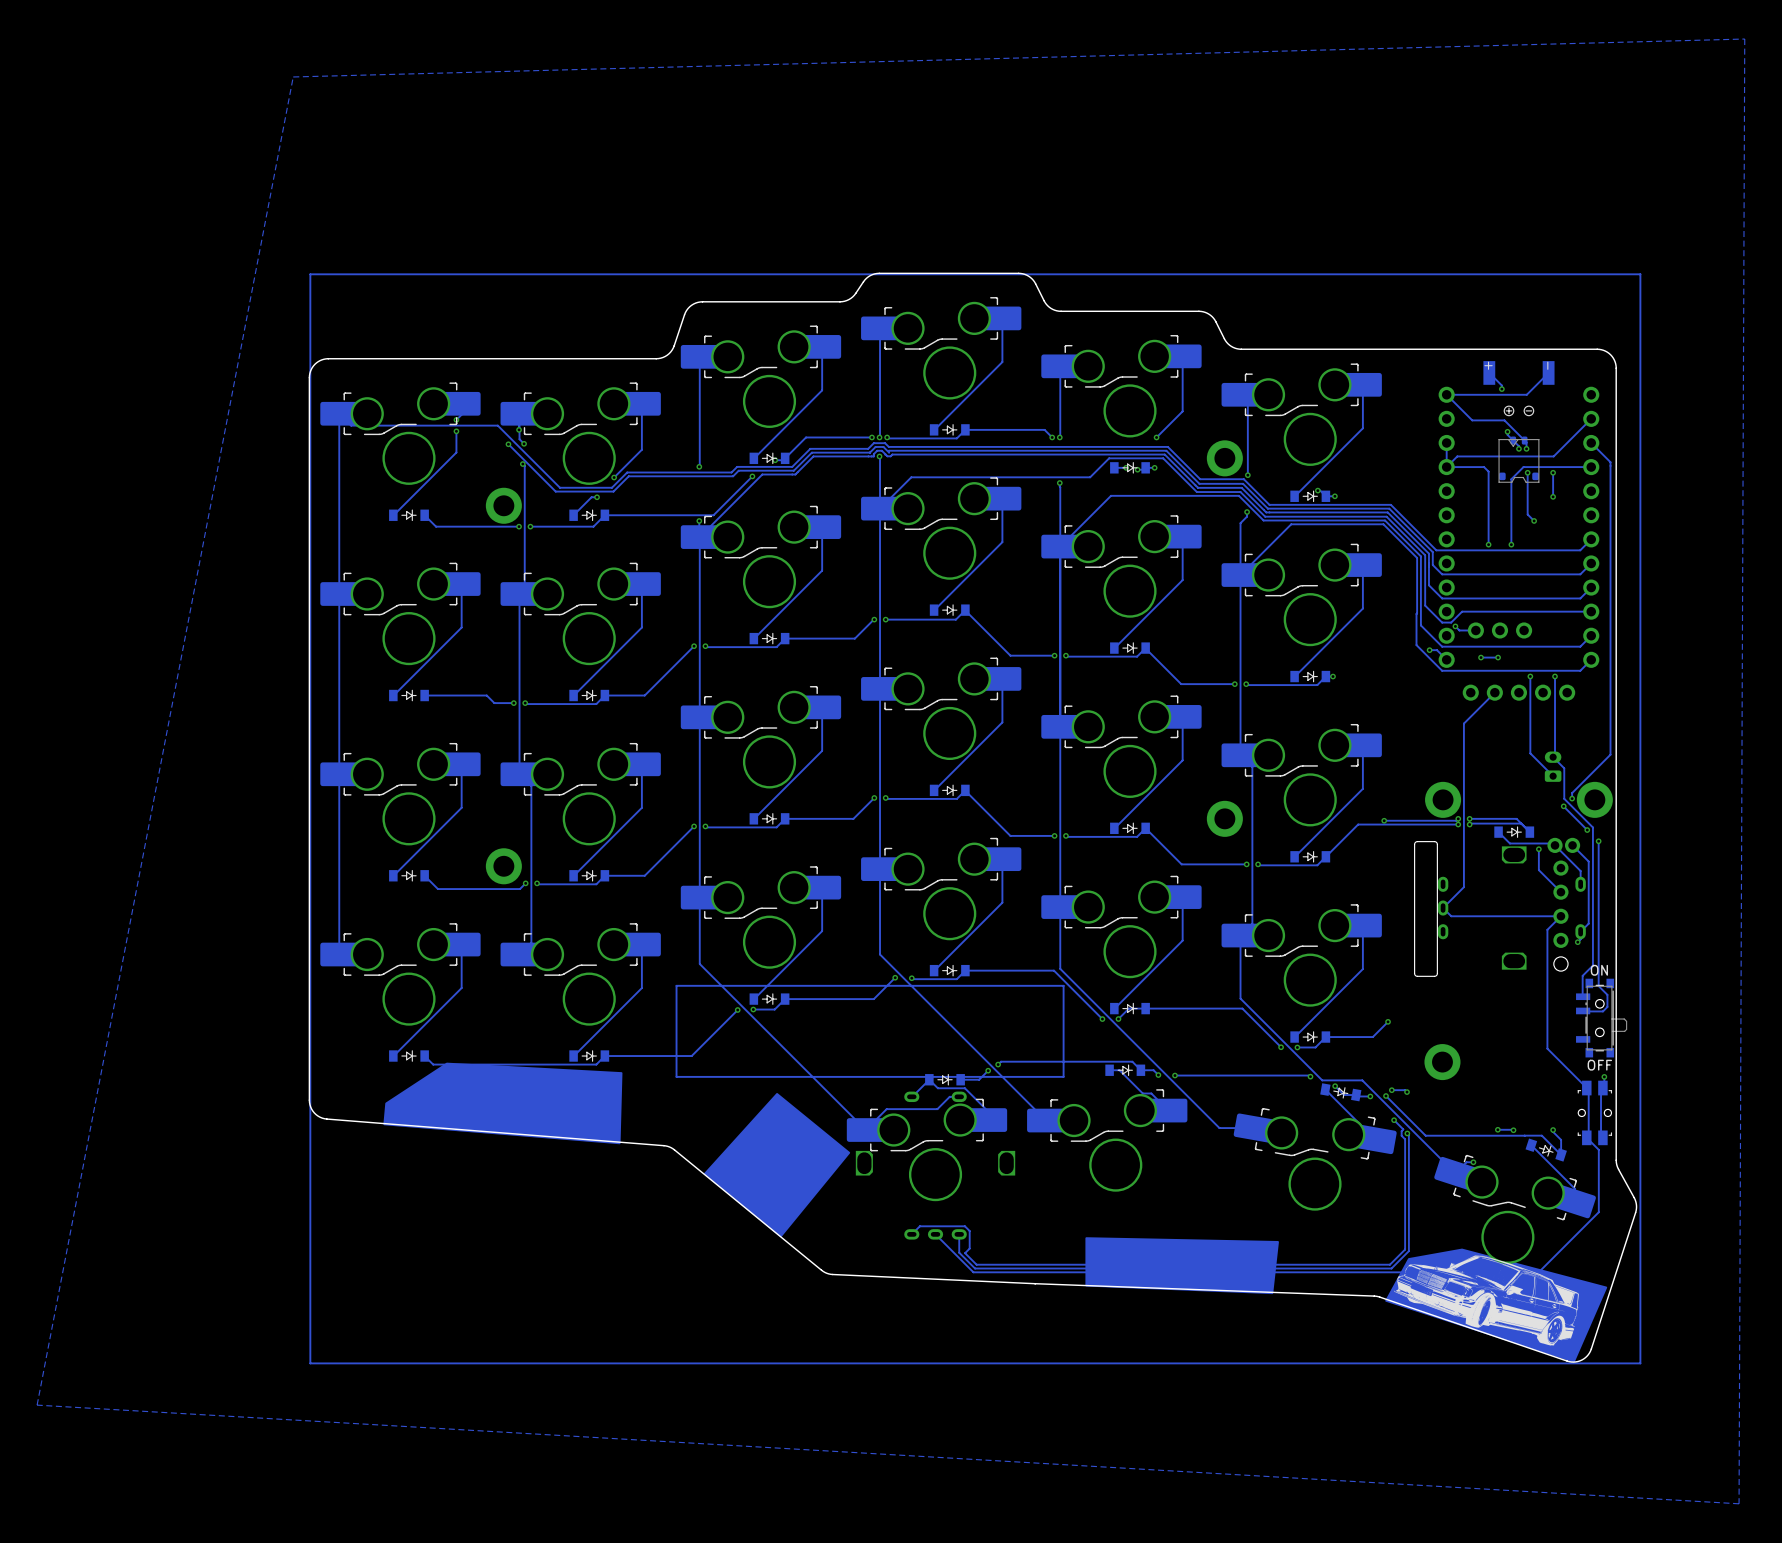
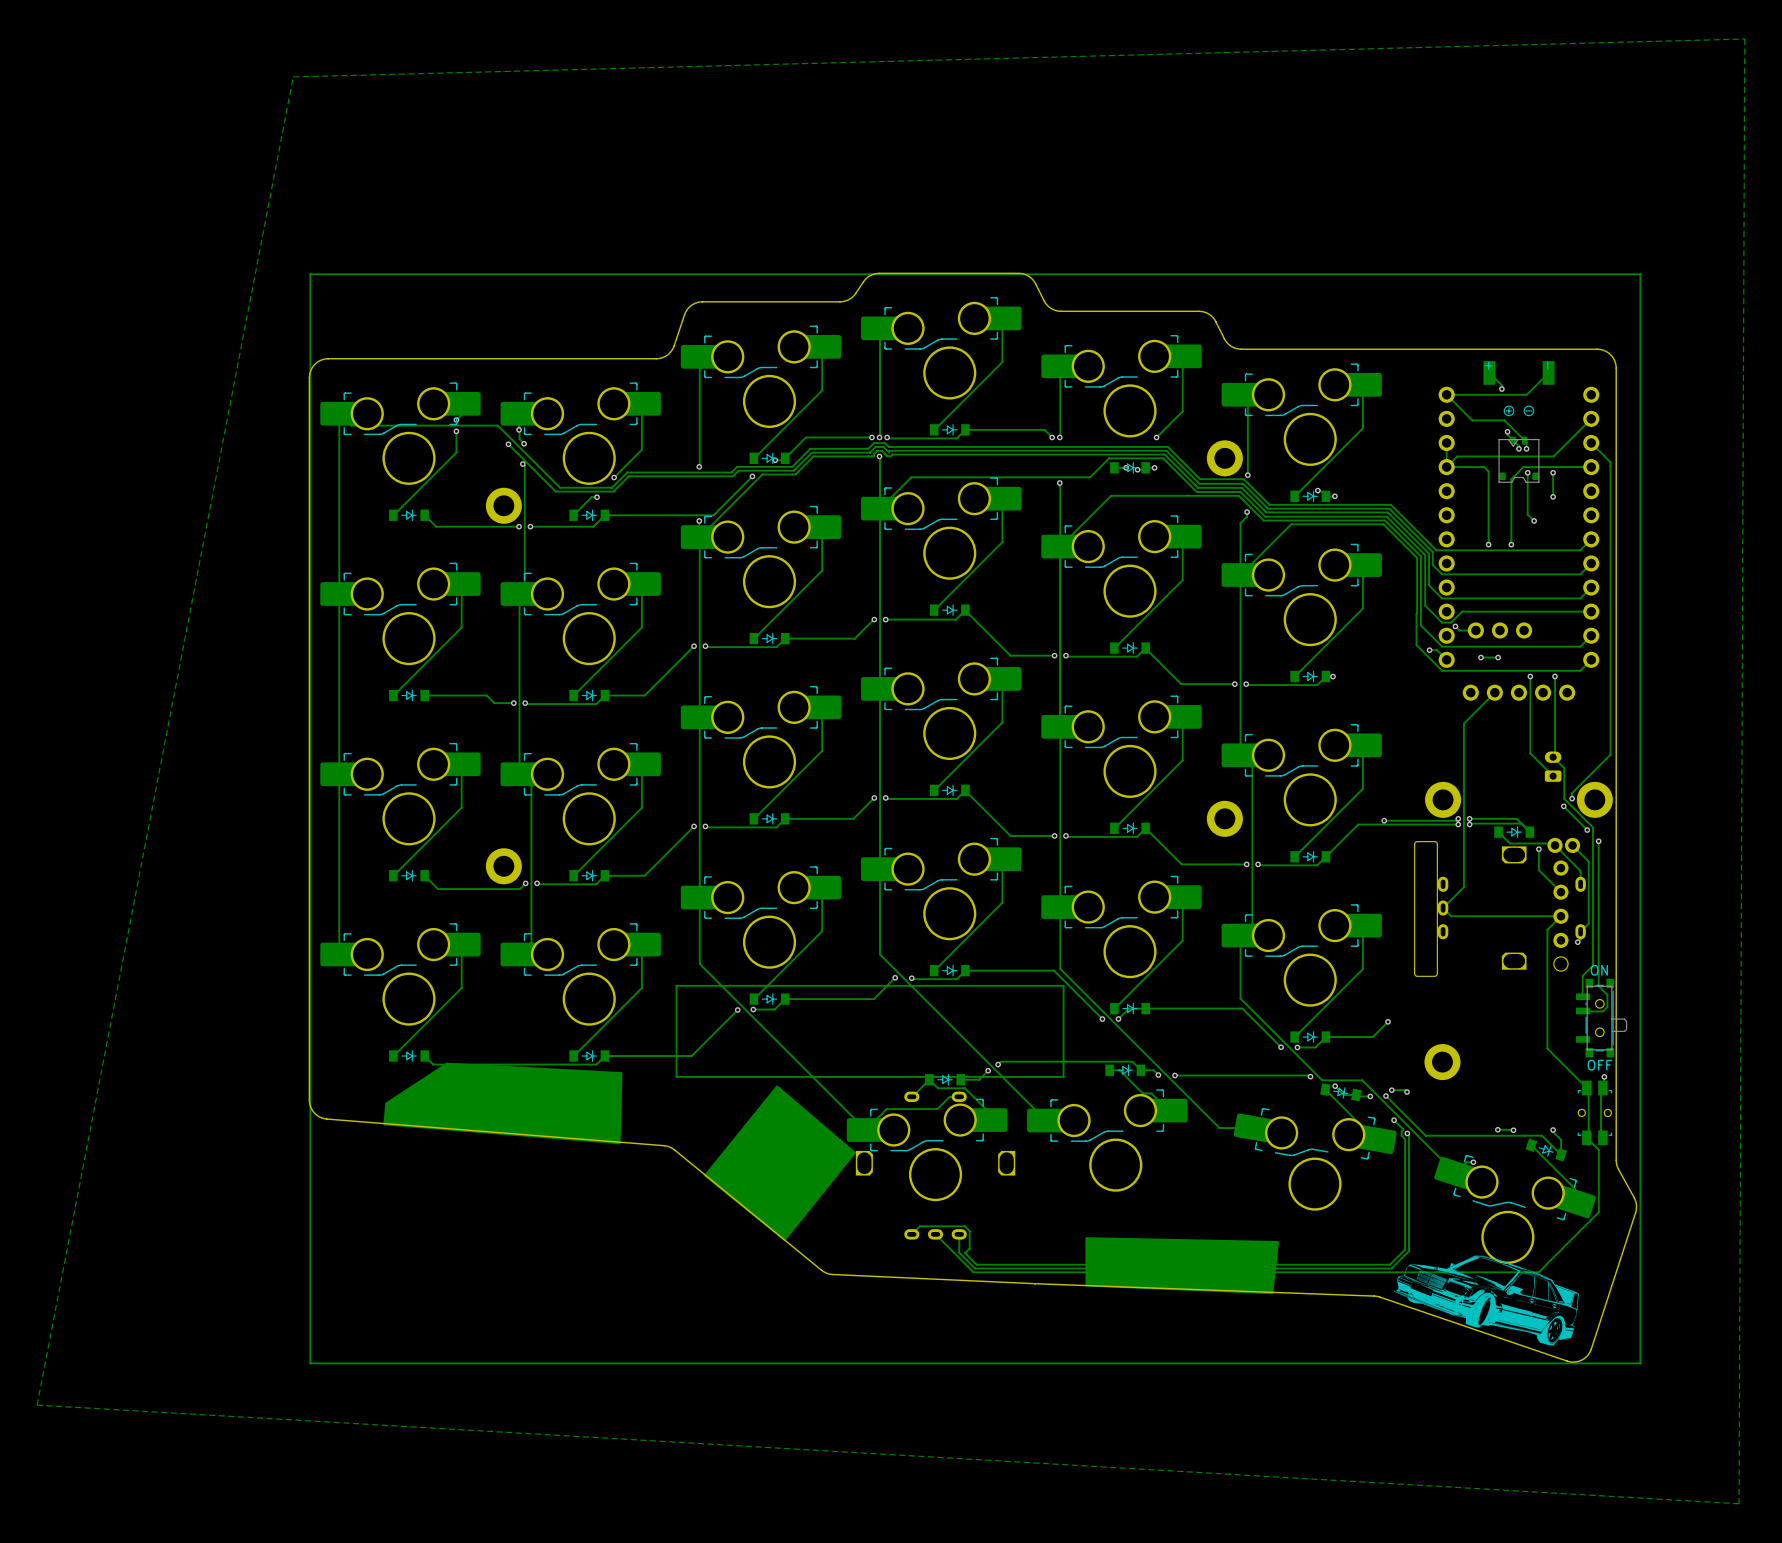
drawing shape: [704, 1093, 851, 1238] -> [704, 1085, 856, 1242]
drawing: [1385, 1248, 1608, 1363] -> none

